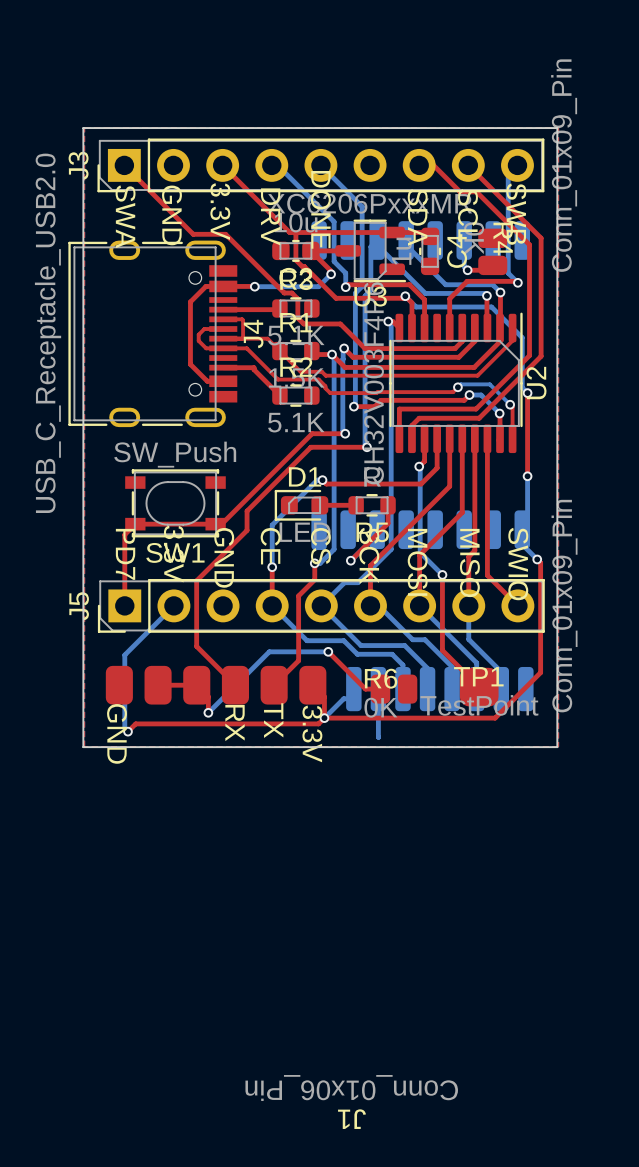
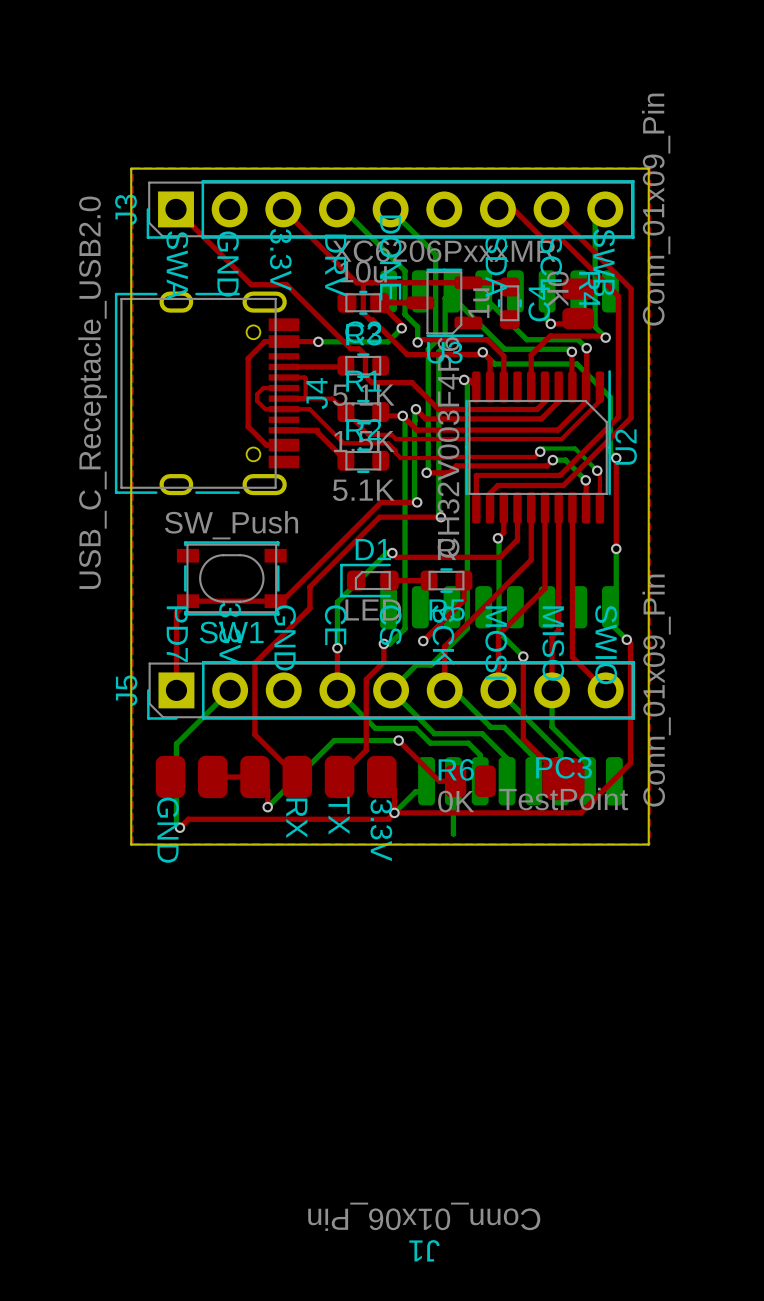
TP1 name: TP1 (478, 676) -> PC3 (564, 767)

